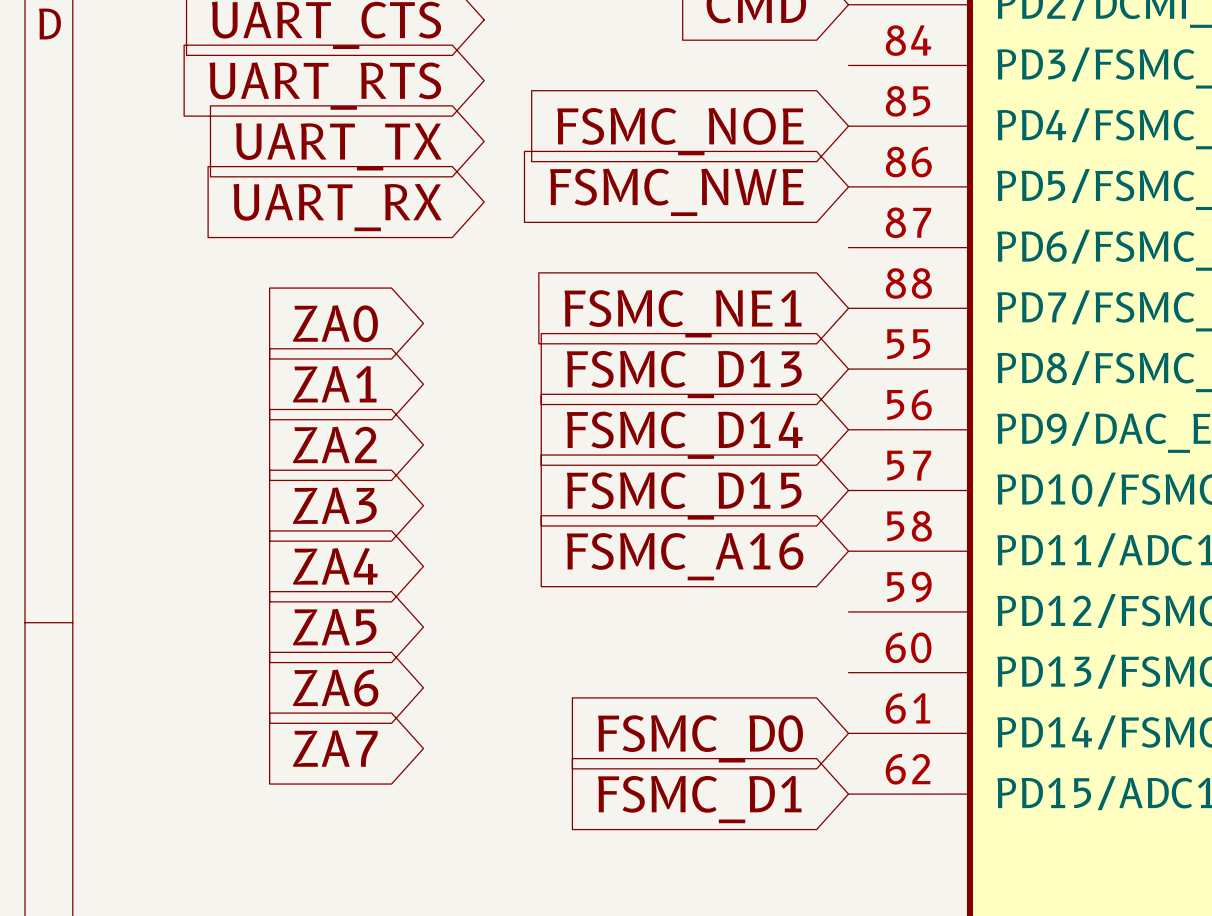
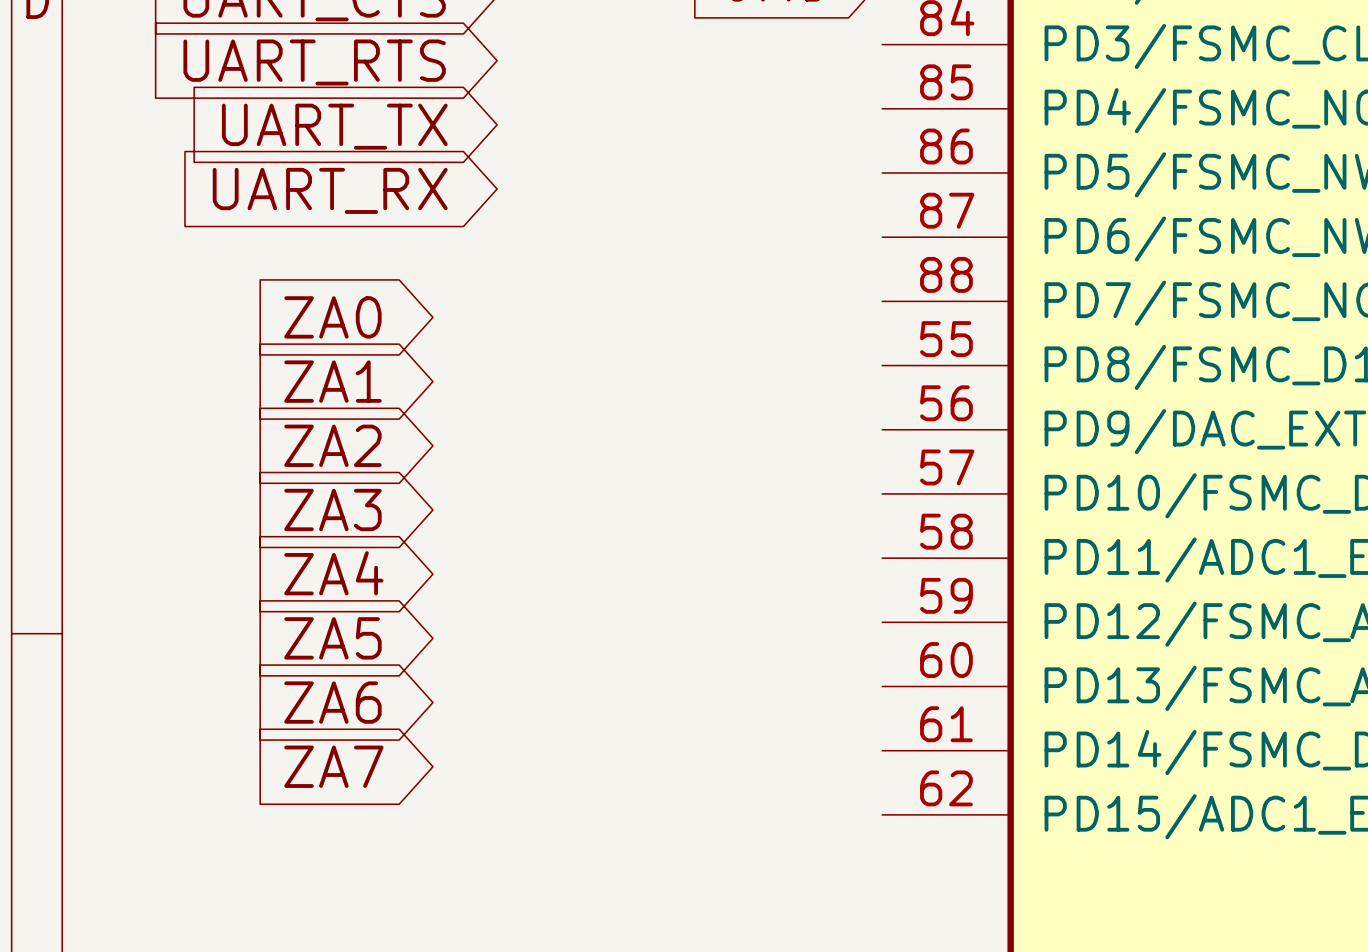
global label: FSMC_NOE (680, 131) -> none
global label: FSMC_NWE (676, 192) -> none
global label: FSMC_NE1 (683, 313) -> none
global label: FSMC_D13 (684, 374) -> none
global label: FSMC_D14 (684, 435) -> none
global label: FSMC_D15 (684, 495) -> none
global label: FSMC_A16 (685, 556) -> none
global label: FSMC_D0 (700, 738) -> none
global label: FSMC_D1 (699, 799) -> none

